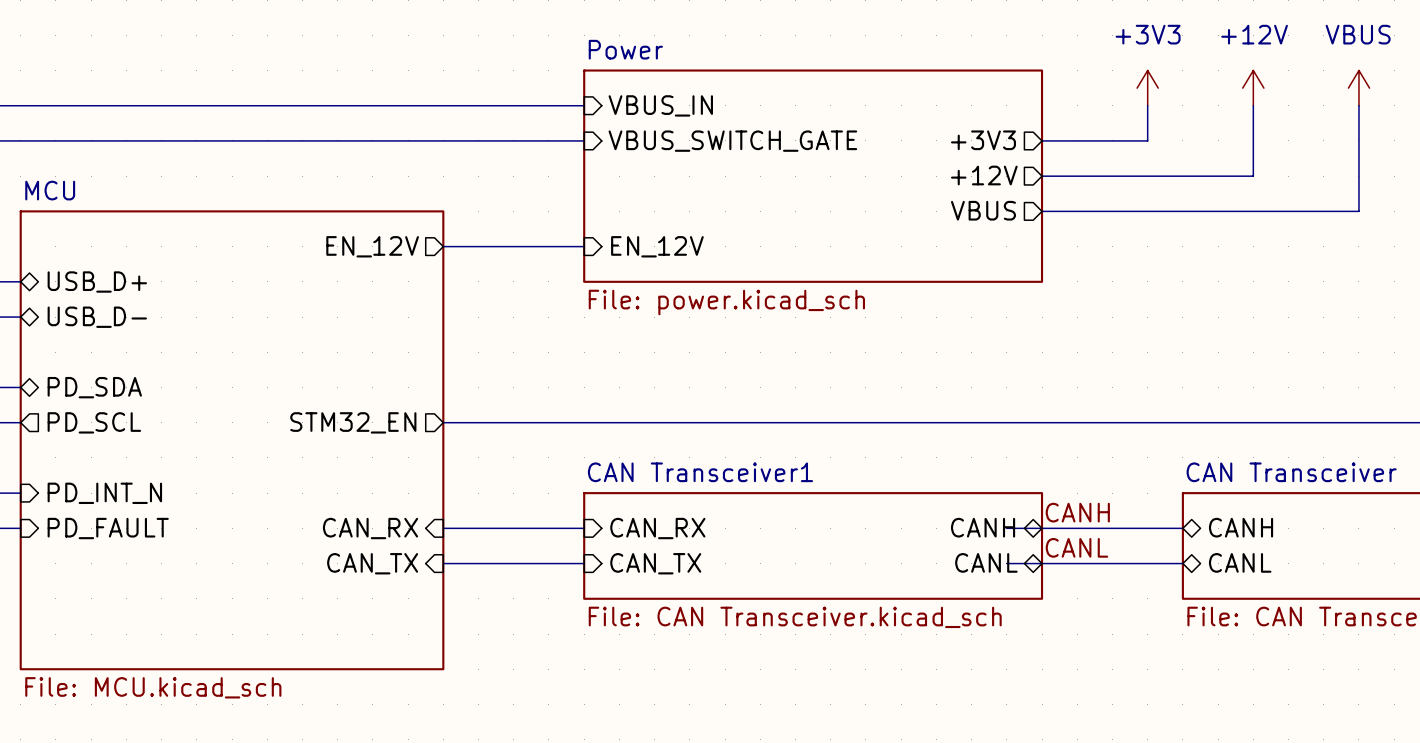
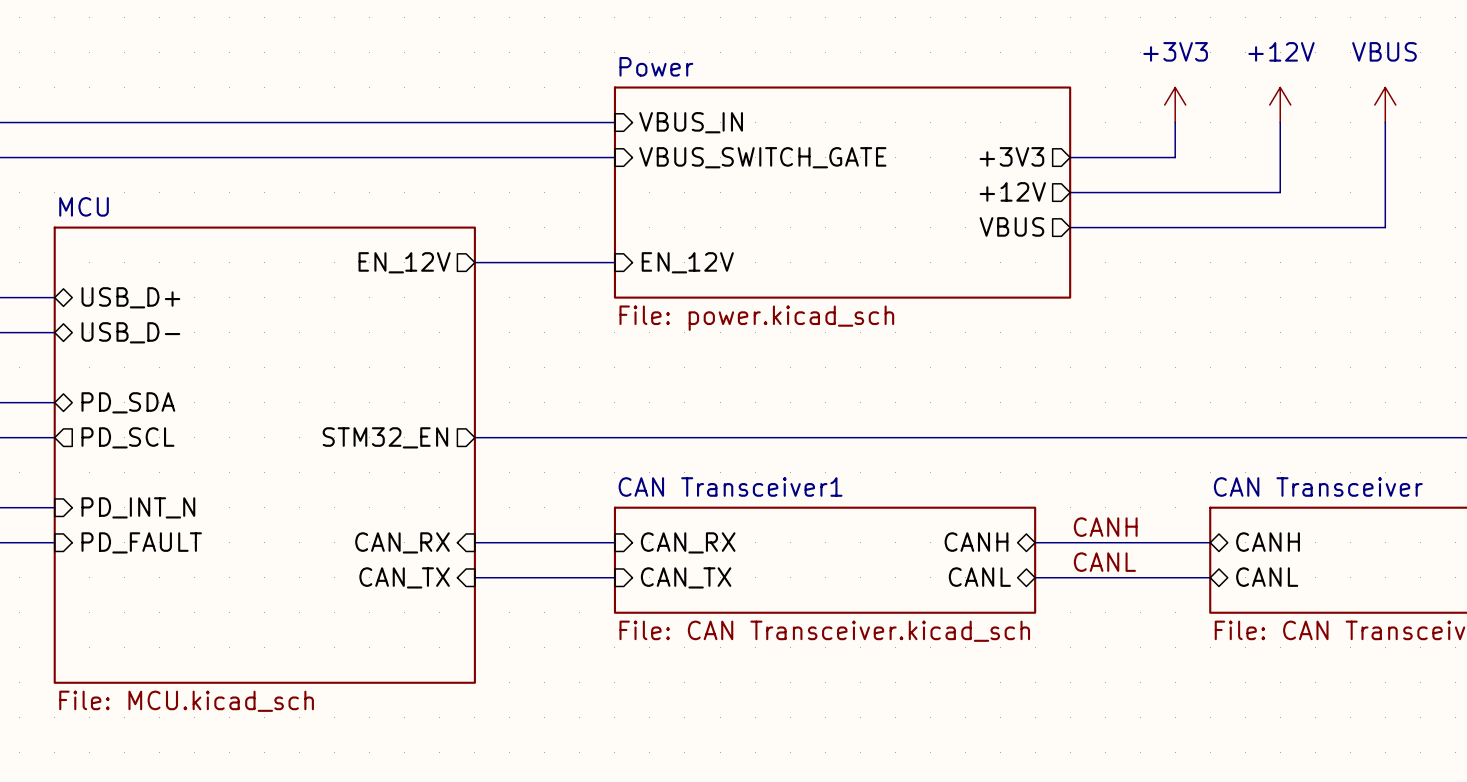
sheet CAN Transceiver1 shape: [583, 492, 1044, 600] -> [613, 506, 1037, 614]
sheet pin position: CANH (983, 527) -> CANH (976, 542)
sheet pin position: CANL (986, 562) -> CANL (979, 577)

